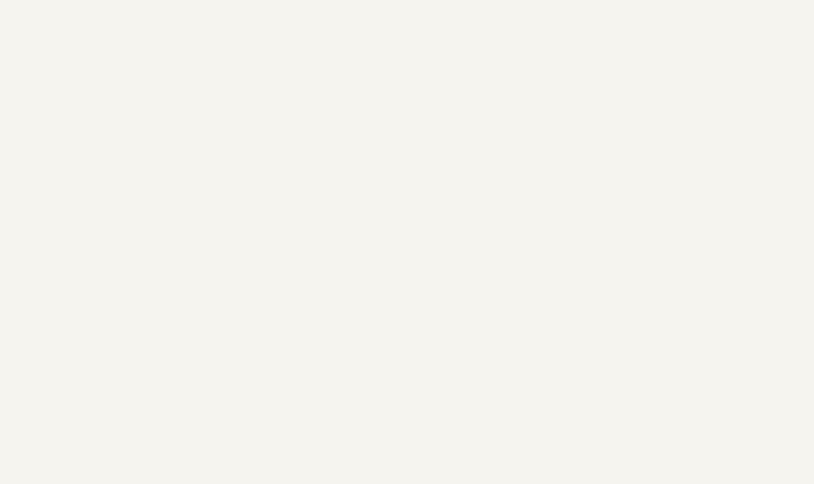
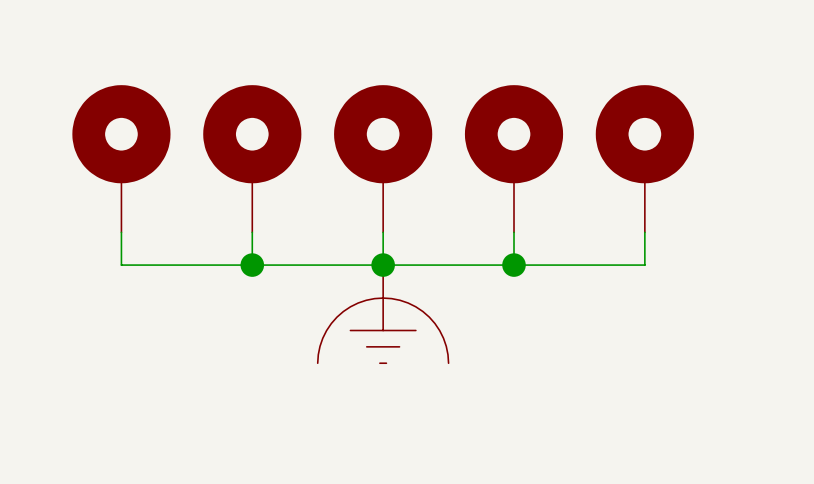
part: none -> (121, 158)
part: none -> (252, 158)
part: none -> (383, 158)
part: none -> (514, 158)
part: none -> (644, 158)
wire: none -> (121, 232) (121, 265) (644, 265) (644, 232)
wire: none -> (252, 232) (252, 265)
wire: none -> (383, 232) (383, 265)
wire: none -> (514, 232) (514, 265)
junction: none -> (252, 265)
junction: none -> (383, 265)
junction: none -> (514, 265)
power symbol: none -> (383, 314)

